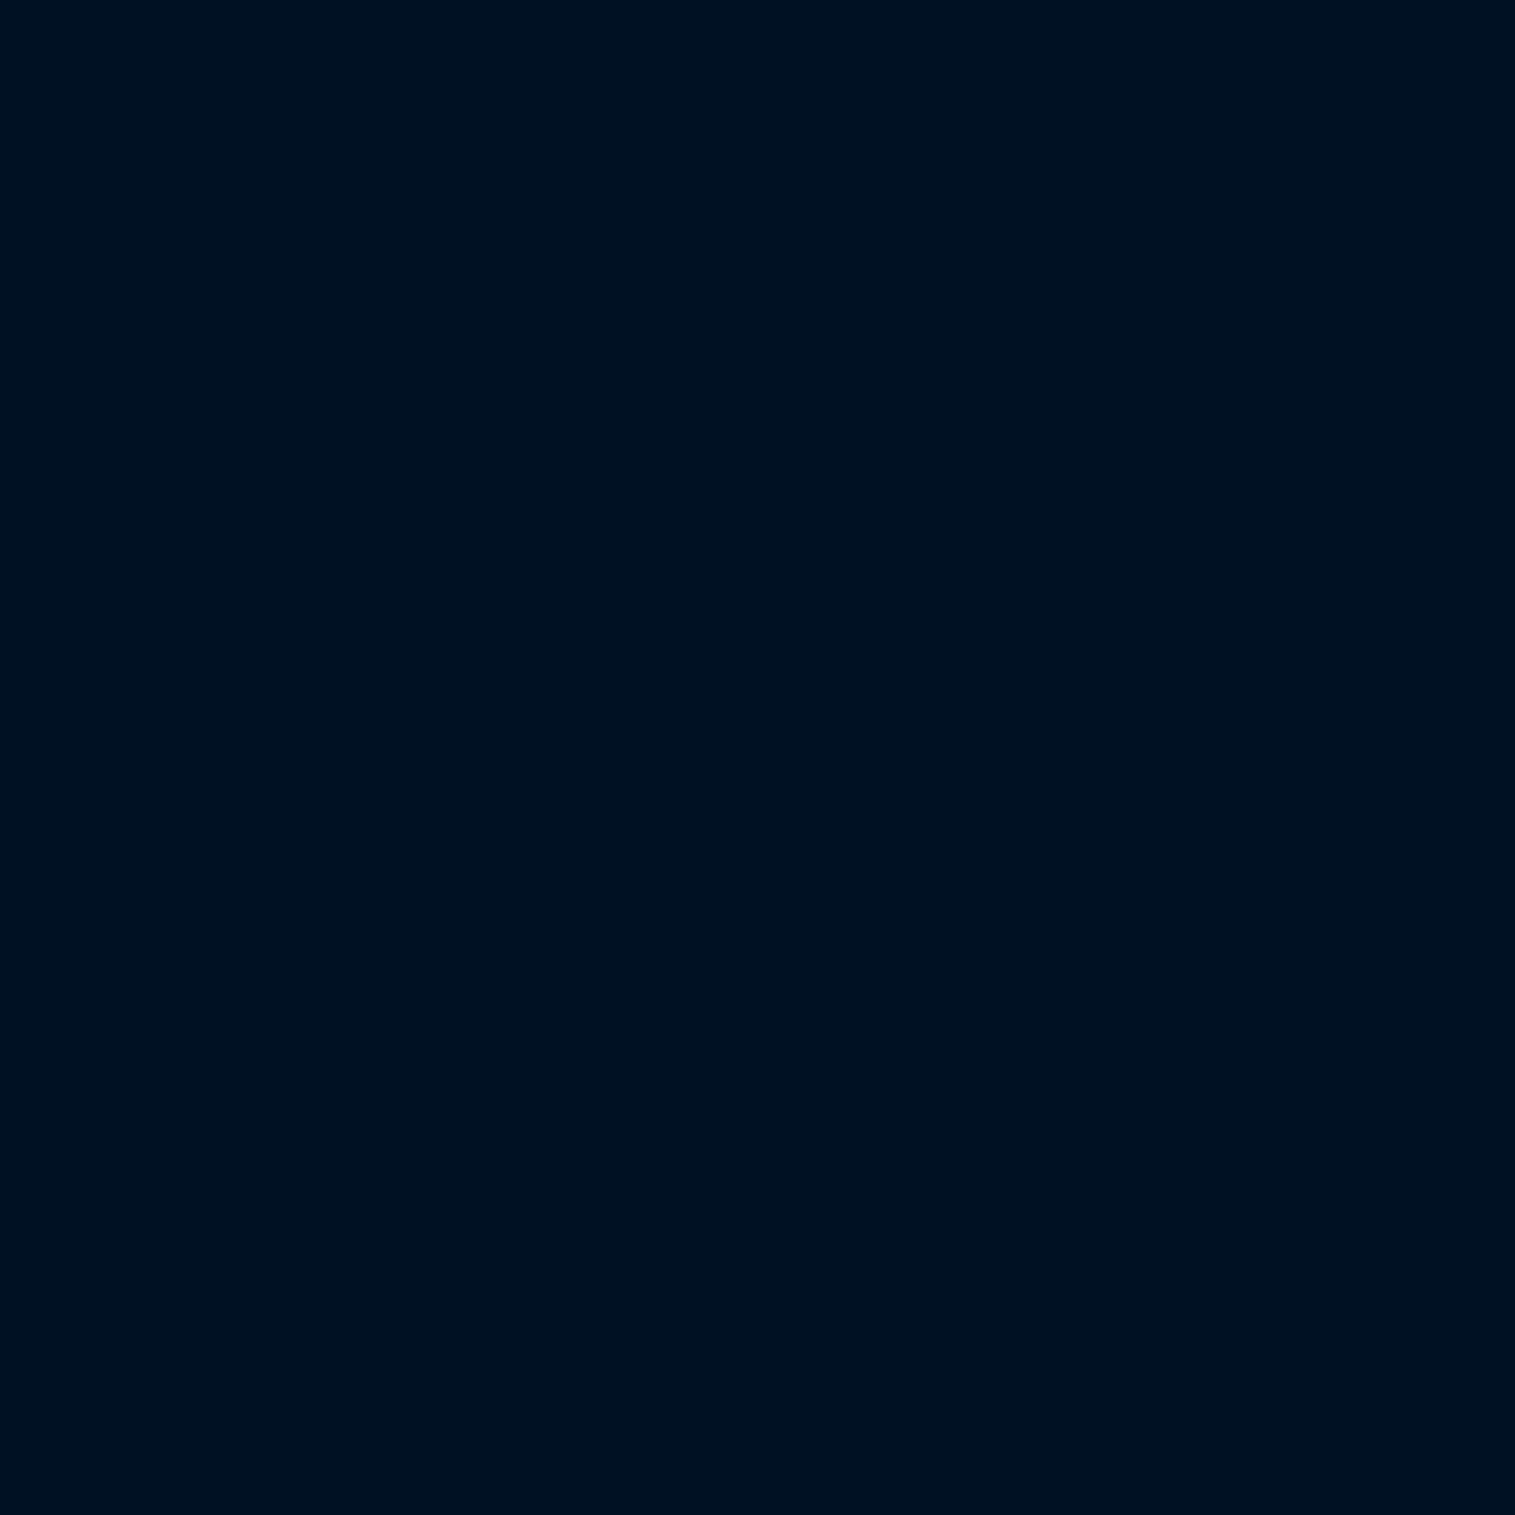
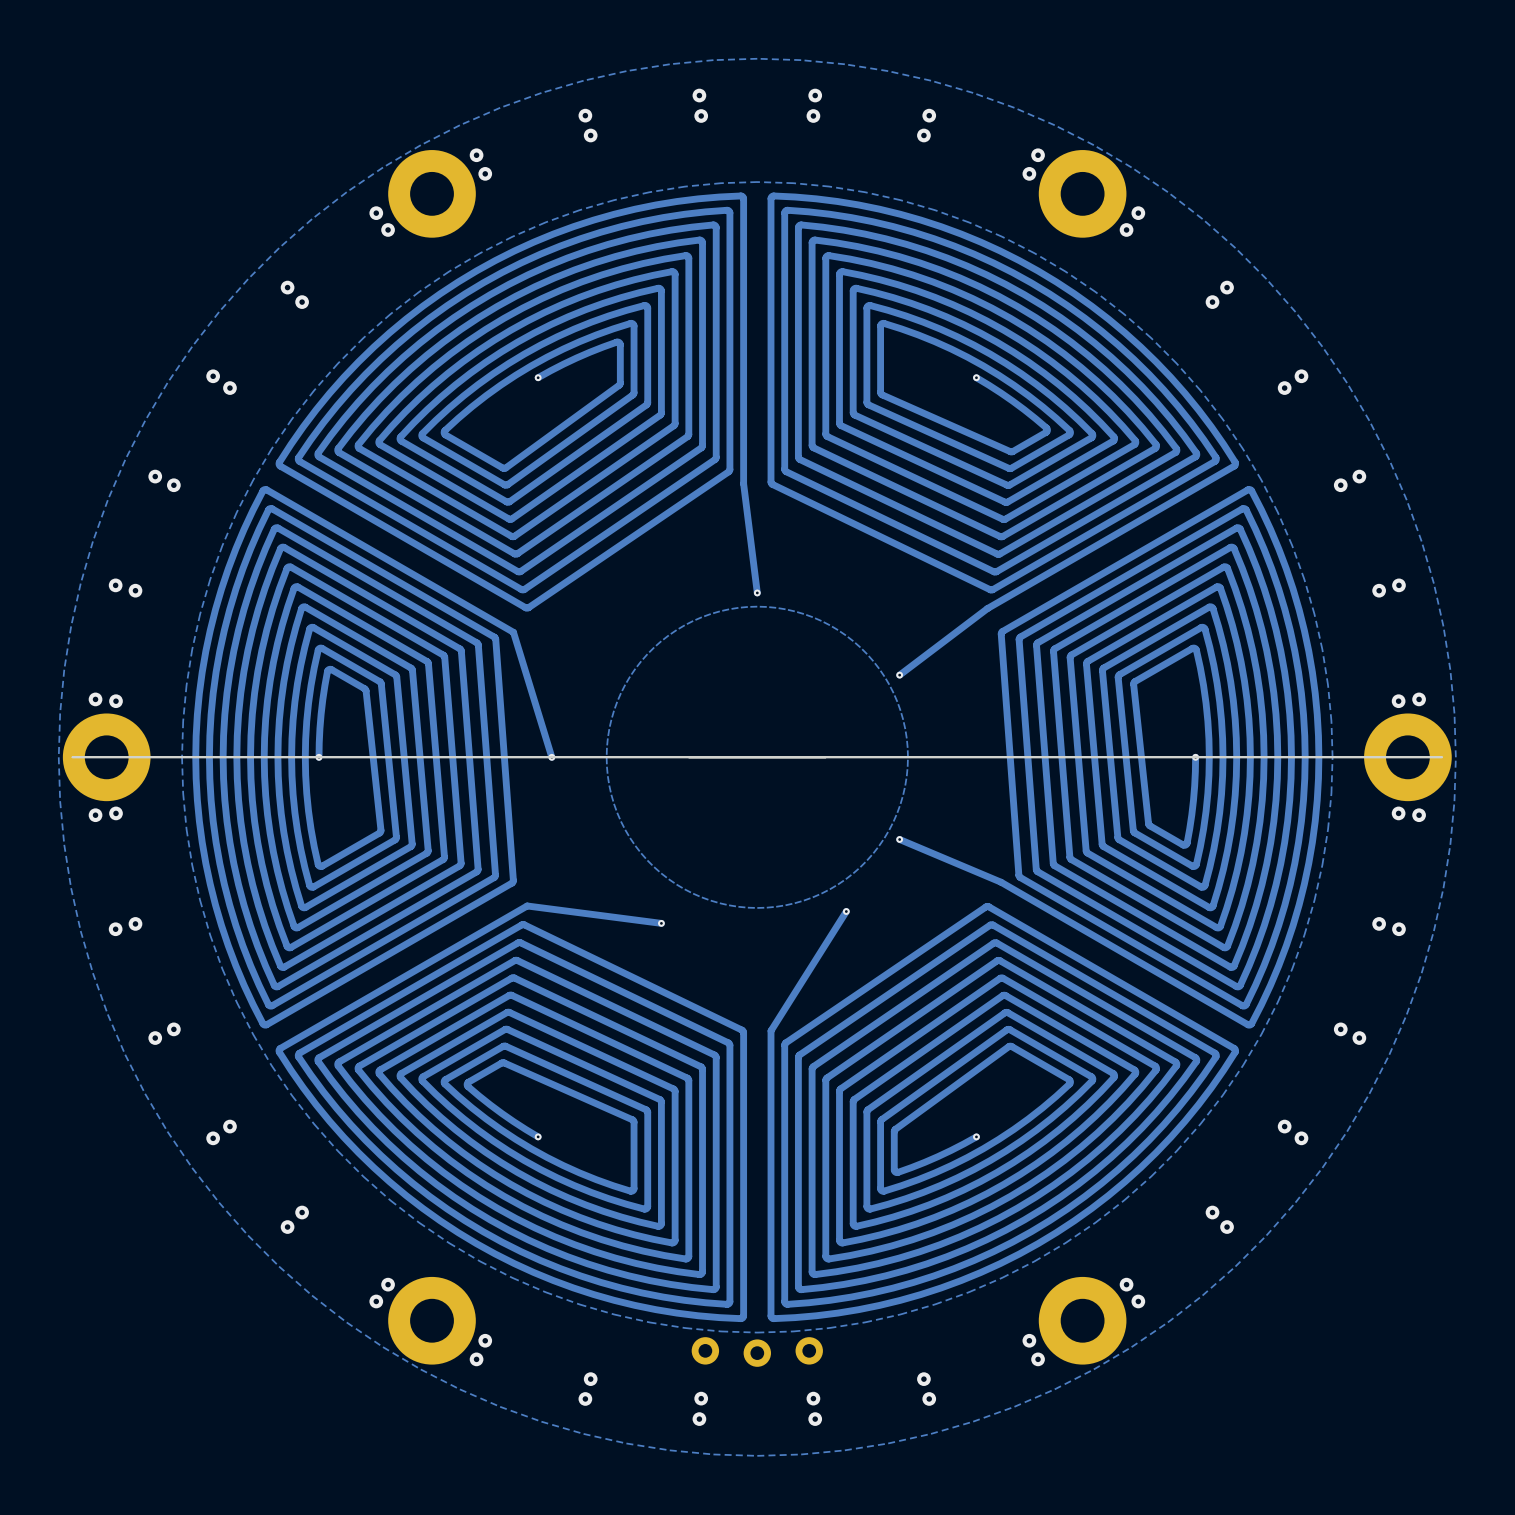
zone outline: none -> (757, 58) (801, 60) (888, 71) (931, 80) (1014, 107) (1093, 145) (1131, 167) (1202, 219) (1266, 279) (1295, 312) (1347, 383) (1369, 420) (1406, 500) (1433, 583) (1443, 626) (1454, 713) (1455, 757) (1454, 801) (1443, 888) (1433, 931) (1406, 1014) (1369, 1093) (1347, 1131) (1295, 1202) (1235, 1266) (1202, 1295) (1131, 1347) (1093, 1369) (1014, 1406) (931, 1433) (888, 1443) (801, 1454) (757, 1455) (713, 1454) (626, 1443) (583, 1433) (500, 1406) (420, 1369) (383, 1347) (312, 1295) (248, 1235) (219, 1202) (167, 1131) (145, 1093) (107, 1014) (80, 931) (71, 888) (60, 801) (58, 757) (60, 713) (71, 626) (80, 583) (107, 500) (145, 420) (167, 383) (219, 312) (279, 248) (312, 219) (383, 167) (420, 145) (500, 107) (583, 80) (626, 71) (713, 60) (757, 58)
via: none -> (699, 95)
via: none -> (815, 95)
via: none -> (585, 115)
via: none -> (929, 115)
via: none -> (701, 116)
via: none -> (813, 116)
via: none -> (590, 135)
via: none -> (923, 135)
via: none -> (476, 155)
via: none -> (1038, 155)
via: none -> (485, 173)
via: none -> (1029, 173)
zone outline: none -> (757, 182) (829, 186) (865, 192) (900, 200) (969, 222) (1002, 236) (1065, 271) (1124, 314) (1151, 337) (1200, 390) (1222, 419) (1261, 480) (1277, 512) (1304, 579) (1322, 649) (1328, 685) (1332, 757) (1328, 829) (1322, 865) (1314, 900) (1292, 969) (1277, 1002) (1243, 1065) (1200, 1124) (1176, 1151) (1124, 1200) (1095, 1222) (1034, 1261) (1002, 1277) (935, 1304) (865, 1322) (829, 1328) (757, 1332) (685, 1328) (649, 1322) (614, 1314) (545, 1292) (512, 1277) (449, 1243) (390, 1200) (363, 1176) (314, 1124) (291, 1095) (253, 1034) (236, 1002) (210, 935) (192, 865) (186, 829) (182, 757) (186, 685) (192, 649) (200, 614) (222, 545) (236, 512) (271, 449) (314, 390) (337, 363) (390, 314) (419, 291) (480, 253) (512, 236) (579, 210) (649, 192) (685, 186) (757, 182)
part: none -> (432, 193)
part: none -> (1082, 193)
via: none -> (376, 213)
via: none -> (1138, 213)
via: none -> (388, 229)
via: none -> (1126, 229)
via: none -> (287, 287)
via: none -> (1227, 287)
via: none -> (302, 302)
via: none -> (1212, 302)
via: none -> (213, 376)
via: none -> (1301, 376)
track: none -> (538, 377) (589, 352) (616, 342) (620, 343) (619, 384) (505, 468) (444, 434) (444, 430) (471, 406) (531, 365) (596, 334) (630, 323) (633, 324) (633, 394) (507, 484) (422, 436) (422, 433) (435, 420) (463, 396) (524, 354) (591, 322) (626, 310) (644, 305) (647, 306) (647, 404) (509, 501) (400, 439) (413, 423) (455, 384) (517, 342) (585, 309) (639, 292) (660, 289) (660, 414) (511, 519) (379, 443) (392, 426) (432, 385) (462, 361) (510, 330) (544, 312) (597, 290) (653, 275) (674, 272) (674, 425) (514, 536) (358, 446) (386, 411) (417, 381) (450, 354) (503, 318) (561, 289) (601, 274) (643, 263) (688, 256) (688, 435) (517, 553) (337, 451) (365, 415) (410, 369) (443, 342) (497, 306) (535, 286) (594, 262) (657, 246) (701, 240) (702, 446) (520, 571) (317, 455) (344, 418) (387, 371) (436, 330) (490, 294) (547, 265) (608, 244) (670, 230) (715, 225) (715, 458) (524, 589) (298, 460) (310, 439) (336, 406) (380, 359) (429, 318) (483, 282) (540, 254) (600, 232) (663, 217) (705, 211) (729, 211) (729, 470) (528, 607) (279, 464) (290, 444) (316, 409) (358, 361) (389, 332) (423, 306) (476, 270) (514, 251) (553, 234) (614, 214) (677, 201) (741, 196) (743, 198) (743, 483) (757, 592)
via: none -> (538, 377)
track: none -> (976, 377) (1024, 409) (1046, 427) (1046, 431) (1011, 451) (881, 394) (880, 324) (884, 323) (918, 334) (983, 365) (1042, 406) (1069, 430) (1070, 434) (1009, 468) (868, 404) (867, 306) (869, 305) (888, 310) (923, 322) (990, 354) (1051, 396) (1078, 420) (1092, 433) (1092, 436) (1008, 485) (854, 414) (853, 289) (874, 292) (928, 309) (997, 342) (1059, 384) (1101, 423) (1114, 439) (1006, 502) (840, 425) (840, 272) (861, 275) (916, 290) (952, 304) (1003, 330) (1036, 350) (1081, 385) (1122, 426) (1135, 443) (1003, 519) (827, 436) (826, 256) (871, 263) (912, 274) (952, 289) (1010, 318) (1046, 341) (1097, 381) (1128, 411) (1156, 446) (1001, 536) (813, 447) (812, 240) (857, 246) (919, 262) (979, 286) (1017, 306) (1071, 342) (1104, 369) (1149, 415) (1176, 451) (998, 554) (799, 459) (799, 225) (843, 230) (906, 244) (966, 265) (1024, 294) (1077, 330) (1126, 371) (1170, 418) (1196, 455) (995, 572) (785, 471) (785, 211) (808, 211) (851, 217) (913, 232) (973, 254) (1031, 282) (1084, 318) (1133, 359) (1177, 406) (1203, 439) (1216, 460) (991, 590) (772, 484) (771, 196) (795, 197) (837, 201) (900, 214) (941, 226) (980, 242) (1038, 270) (1074, 293) (1108, 319) (1156, 361) (1198, 409) (1235, 463) (1234, 466) (987, 608) (899, 675)
via: none -> (976, 377)
via: none -> (229, 388)
via: none -> (1284, 388)
via: none -> (155, 476)
via: none -> (1359, 476)
via: none -> (173, 485)
via: none -> (1340, 485)
via: none -> (115, 585)
via: none -> (1398, 585)
via: none -> (135, 590)
via: none -> (1379, 590)
via: none -> (757, 592)
zone outline: none -> (757, 606) (785, 609) (812, 617) (838, 630) (860, 647) (884, 676) (897, 701) (905, 729) (907, 757) (905, 785) (897, 812) (884, 838) (867, 860) (838, 884) (812, 897) (785, 905) (757, 907) (729, 905) (701, 897) (676, 884) (654, 867) (630, 838) (617, 812) (609, 785) (606, 757) (609, 729) (617, 701) (630, 676) (647, 654) (676, 630) (701, 617) (729, 609) (757, 606)
via: none -> (899, 675)
via: none -> (95, 699)
via: none -> (1419, 699)
via: none -> (116, 701)
via: none -> (1398, 701)
board edge: none -> (72, 757) (1442, 757) (72, 757)
part: none -> (106, 757)
via: none -> (319, 757)
track: none -> (551, 757) (513, 632) (266, 489) (263, 490) (235, 548) (215, 609) (205, 651) (199, 693) (195, 757) (199, 821) (205, 863) (215, 904) (235, 965) (253, 1004) (264, 1025) (513, 880) (495, 638) (270, 508) (259, 529) (242, 568) (224, 630) (213, 693) (209, 757) (213, 821) (224, 884) (242, 945) (259, 985) (270, 1006) (495, 875) (477, 643) (276, 527) (257, 568) (238, 630) (226, 693) (223, 757) (226, 821) (238, 884) (257, 945) (276, 986) (478, 869) (460, 649) (282, 547) (264, 588) (247, 650) (238, 714) (236, 757) (238, 800) (247, 863) (264, 925) (282, 967) (461, 863) (444, 656) (288, 566) (272, 609) (261, 650) (252, 714) (250, 757) (252, 800) (261, 864) (272, 905) (288, 947) (444, 857) (428, 662) (296, 586) (287, 606) (273, 662) (267, 699) (264, 757) (267, 814) (273, 852) (287, 908) (296, 927) (428, 850) (412, 669) (303, 606) (296, 626) (283, 682) (277, 757) (283, 832) (296, 887) (303, 907) (412, 844) (396, 676) (312, 627) (309, 628) (304, 647) (297, 683) (291, 757) (297, 831) (304, 867) (309, 885) (312, 887) (396, 837) (381, 683) (321, 648) (318, 650) (311, 685) (305, 757) (311, 829) (318, 864) (321, 866) (380, 830) (365, 690) (330, 669) (327, 671) (322, 699) (319, 757)
via: none -> (551, 757)
track: none -> (1195, 757) (1191, 814) (1187, 843) (1183, 845) (1148, 824) (1133, 683) (1193, 648) (1196, 650) (1203, 685) (1209, 757) (1203, 829) (1196, 864) (1193, 866) (1133, 831) (1118, 677) (1202, 627) (1204, 628) (1209, 647) (1217, 683) (1223, 757) (1217, 831) (1209, 867) (1204, 885) (1202, 887) (1118, 838) (1102, 670) (1210, 606) (1218, 626) (1230, 682) (1236, 757) (1230, 832) (1218, 887) (1210, 907) (1102, 845) (1086, 663) (1218, 586) (1226, 606) (1241, 662) (1247, 699) (1250, 757) (1248, 795) (1241, 852) (1226, 908) (1218, 927) (1086, 851) (1070, 657) (1225, 566) (1241, 609) (1252, 650) (1260, 692) (1264, 757) (1262, 800) (1252, 864) (1241, 905) (1225, 947) (1070, 858) (1053, 651) (1232, 547) (1249, 588) (1266, 650) (1276, 714) (1277, 757) (1276, 800) (1266, 863) (1249, 925) (1232, 967) (1053, 864) (1036, 645) (1238, 527) (1257, 568) (1276, 630) (1287, 693) (1291, 757) (1287, 821) (1276, 884) (1257, 945) (1238, 986) (1036, 870) (1019, 639) (1244, 508) (1255, 529) (1271, 568) (1290, 630) (1301, 693) (1305, 757) (1301, 821) (1290, 884) (1271, 945) (1255, 985) (1244, 1006) (1019, 876) (1001, 633) (1249, 489) (1261, 509) (1278, 548) (1299, 609) (1308, 651) (1315, 693) (1318, 757) (1315, 821) (1308, 863) (1299, 904) (1278, 965) (1251, 1024) (1247, 1024) (1001, 882) (899, 839)
via: none -> (1195, 757)
part: none -> (1407, 757)
via: none -> (116, 813)
via: none -> (1398, 813)
via: none -> (95, 815)
via: none -> (1419, 815)
via: none -> (899, 839)
track: none -> (846, 911) (771, 1030) (771, 1317) (795, 1317) (837, 1313) (900, 1300) (961, 1280) (1000, 1263) (1038, 1243) (1091, 1208) (1124, 1181) (1156, 1152) (1198, 1104) (1223, 1070) (1235, 1049) (986, 906) (785, 1043) (785, 1303) (808, 1302) (851, 1297) (913, 1282) (973, 1260) (1031, 1231) (1084, 1196) (1133, 1155) (1177, 1108) (1203, 1074) (1216, 1054) (990, 925) (798, 1055) (799, 1288) (843, 1284) (906, 1270) (966, 1248) (1024, 1219) (1077, 1184) (1126, 1142) (1170, 1095) (1196, 1059) (994, 942) (812, 1067) (812, 1273) (857, 1268) (919, 1251) (959, 1236) (1017, 1208) (1053, 1185) (1104, 1145) (1149, 1099) (1176, 1063) (997, 960) (826, 1078) (826, 1258) (871, 1251) (912, 1239) (952, 1224) (1010, 1196) (1064, 1160) (1097, 1133) (1128, 1102) (1156, 1067) (1000, 978) (839, 1089) (840, 1241) (861, 1239) (916, 1223) (969, 1202) (1003, 1184) (1036, 1163) (1081, 1128) (1122, 1088) (1135, 1071) (1002, 995) (853, 1100) (853, 1225) (874, 1222) (928, 1204) (997, 1172) (1059, 1129) (1101, 1091) (1114, 1074) (1005, 1012) (867, 1110) (867, 1207) (869, 1209) (888, 1204) (923, 1192) (990, 1160) (1051, 1118) (1078, 1094) (1092, 1080) (1092, 1077) (1007, 1029) (881, 1120) (880, 1189) (884, 1191) (918, 1179) (983, 1148) (1042, 1107) (1069, 1084) (1070, 1080) (1009, 1046) (894, 1129) (894, 1170) (897, 1172) (924, 1162) (976, 1136)
via: none -> (846, 911)
via: none -> (135, 923)
track: none -> (661, 923) (527, 905) (280, 1048) (279, 1051) (316, 1104) (358, 1152) (406, 1195) (440, 1220) (476, 1243) (533, 1272) (573, 1287) (614, 1300) (677, 1313) (719, 1317) (742, 1317) (742, 1030) (523, 924) (298, 1054) (310, 1074) (336, 1108) (380, 1155) (429, 1196) (483, 1231) (540, 1260) (600, 1282) (663, 1297) (705, 1302) (729, 1303) (728, 1043) (519, 942) (317, 1059) (344, 1095) (387, 1142) (436, 1184) (490, 1219) (547, 1248) (608, 1270) (670, 1284) (715, 1288) (714, 1055) (516, 960) (337, 1063) (365, 1099) (410, 1145) (460, 1185) (497, 1208) (554, 1236) (594, 1251) (657, 1268) (701, 1273) (701, 1066) (513, 977) (358, 1067) (386, 1102) (417, 1133) (450, 1160) (503, 1196) (542, 1216) (602, 1239) (643, 1251) (688, 1258) (687, 1078) (510, 995) (379, 1071) (392, 1088) (432, 1128) (478, 1163) (510, 1184) (562, 1210) (597, 1223) (653, 1239) (674, 1241) (673, 1089) (508, 1012) (400, 1074) (413, 1091) (455, 1129) (517, 1172) (585, 1204) (639, 1222) (660, 1225) (660, 1099) (506, 1029) (422, 1077) (422, 1080) (435, 1094) (463, 1118) (524, 1160) (591, 1192) (626, 1204) (644, 1209) (647, 1207) (646, 1109) (505, 1046) (444, 1080) (444, 1084) (471, 1107) (531, 1148) (596, 1179) (630, 1191) (633, 1189) (632, 1119) (503, 1062) (467, 1082) (468, 1086) (490, 1104) (538, 1136)
via: none -> (661, 923)
via: none -> (1379, 923)
via: none -> (115, 929)
via: none -> (1398, 929)
via: none -> (173, 1029)
via: none -> (1340, 1029)
via: none -> (155, 1038)
via: none -> (1359, 1038)
via: none -> (229, 1126)
via: none -> (1284, 1126)
via: none -> (538, 1136)
via: none -> (976, 1136)
via: none -> (213, 1138)
via: none -> (1301, 1138)
via: none -> (302, 1212)
via: none -> (1212, 1212)
via: none -> (287, 1227)
via: none -> (1227, 1227)
via: none -> (388, 1284)
via: none -> (1126, 1284)
via: none -> (376, 1301)
via: none -> (1138, 1301)
part: none -> (432, 1320)
part: none -> (1082, 1320)
via: none -> (485, 1340)
via: none -> (1029, 1340)
part: none -> (705, 1350)
part: none -> (809, 1350)
part: none -> (757, 1353)
via: none -> (476, 1359)
via: none -> (1038, 1359)
via: none -> (590, 1379)
via: none -> (923, 1379)
via: none -> (585, 1398)
via: none -> (701, 1398)
via: none -> (813, 1398)
via: none -> (929, 1398)
via: none -> (699, 1419)
via: none -> (815, 1419)

